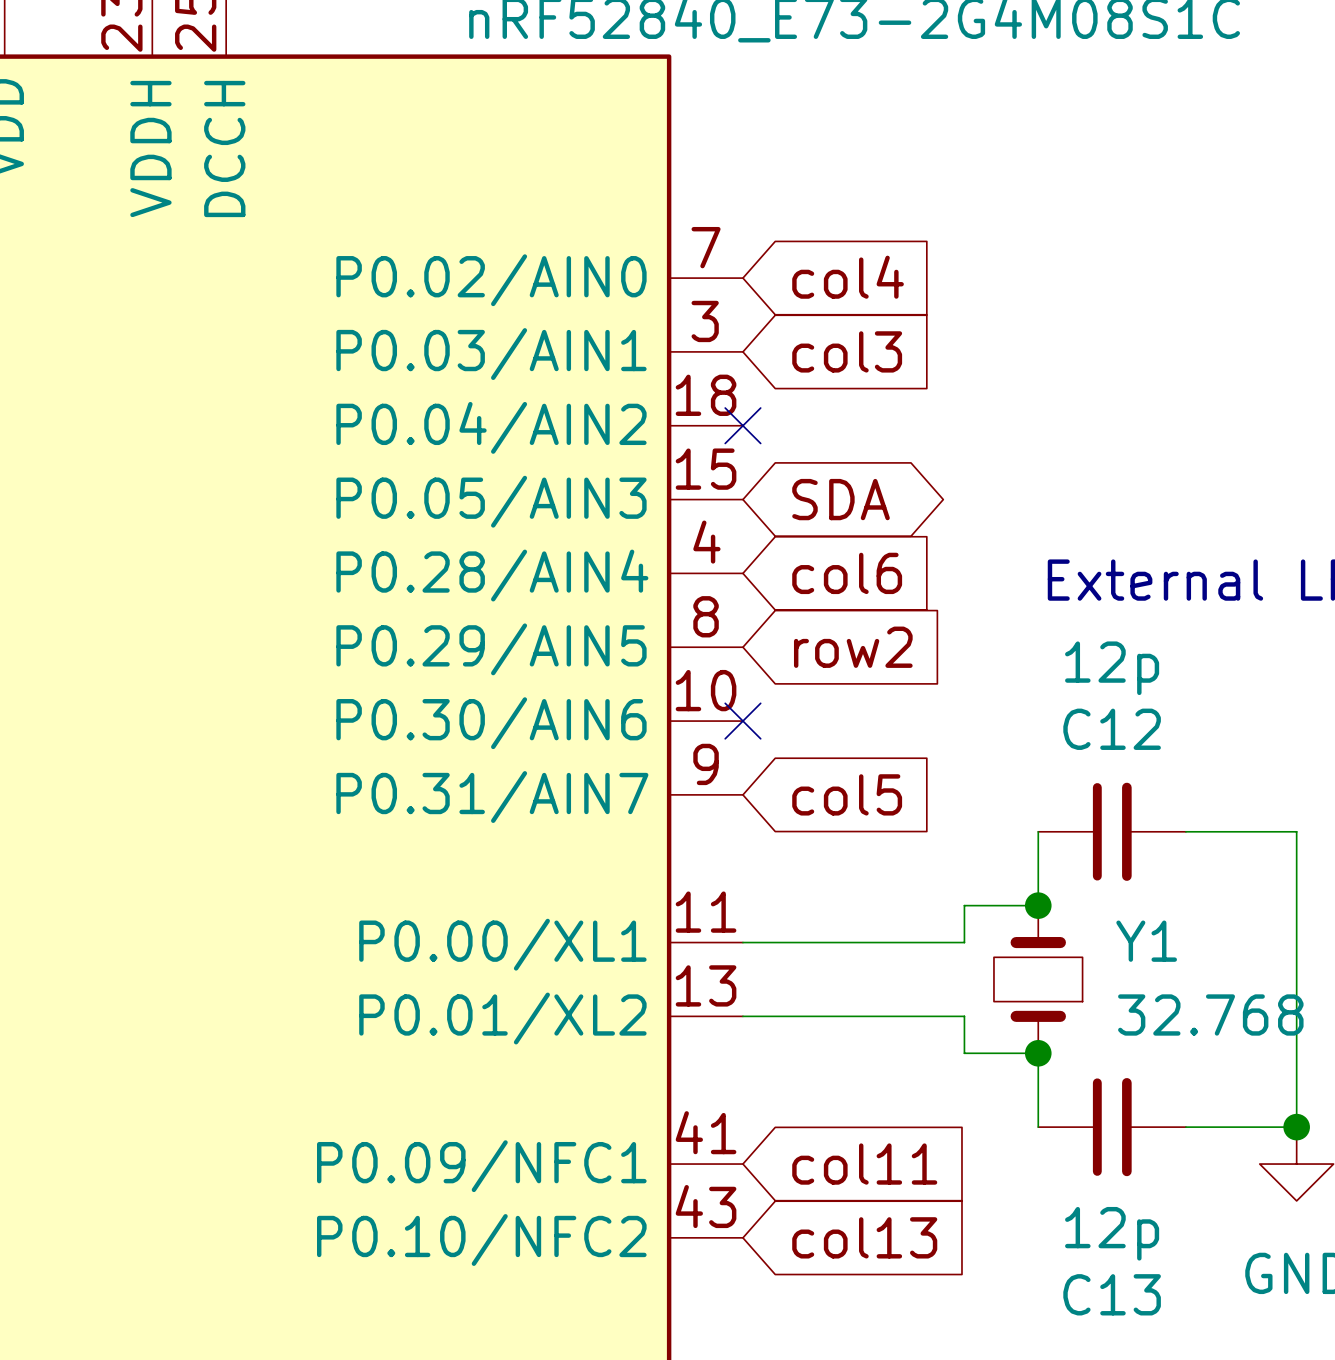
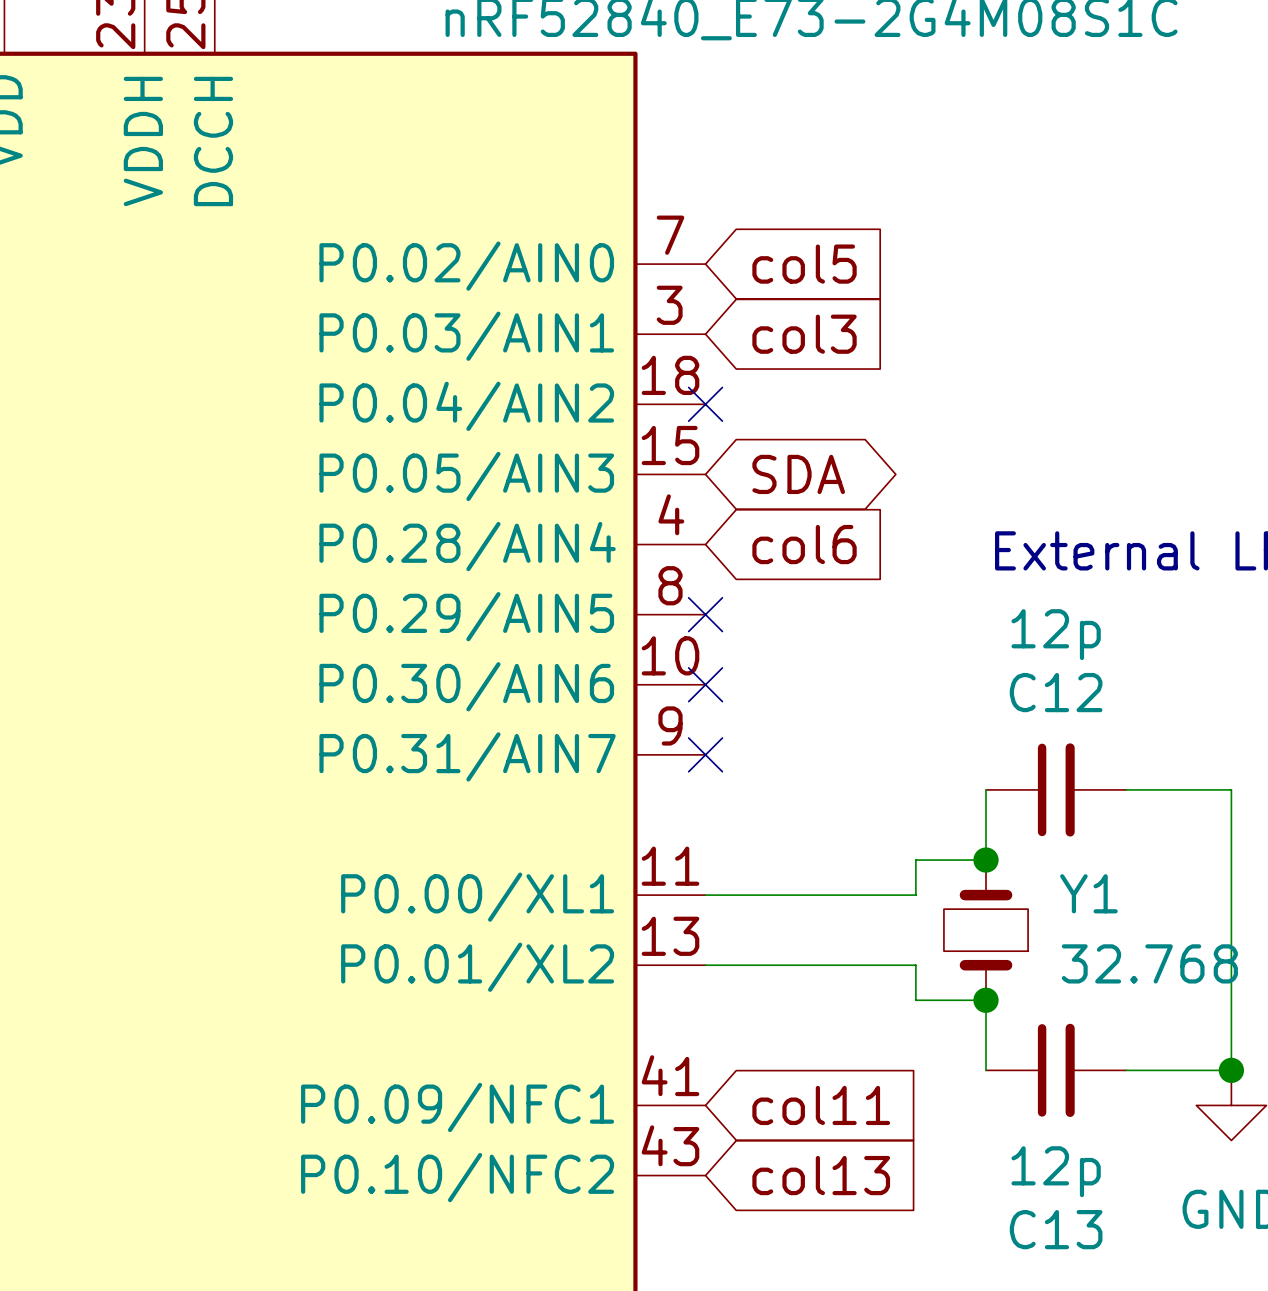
global label: col4 (848, 277) -> col5 (804, 264)
no-connect mark: none -> (705, 614)
global label: row2 (853, 647) -> none
no-connect mark: none -> (705, 754)
global label: col5 (847, 794) -> none

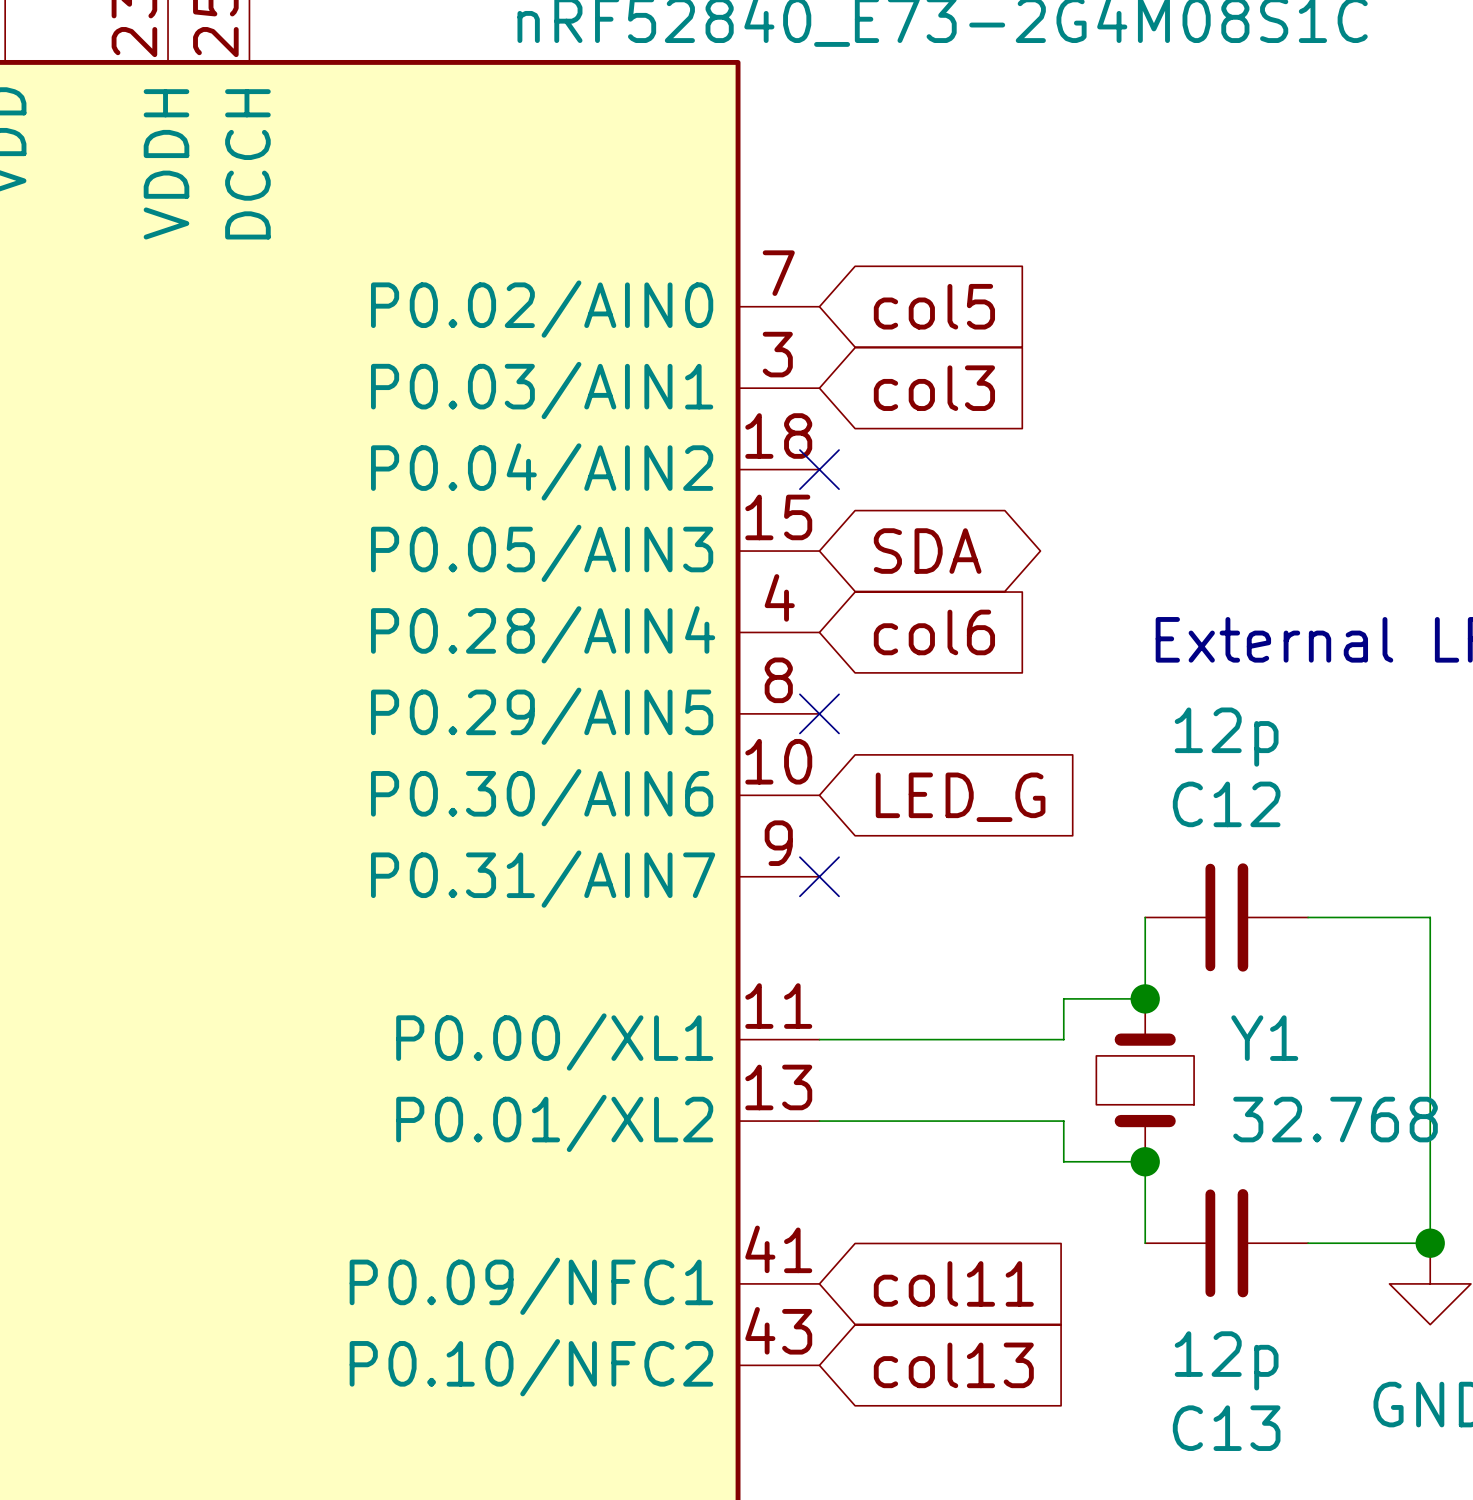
no-connect mark: (705, 684) -> none
global label: none -> LED_G (960, 797)

